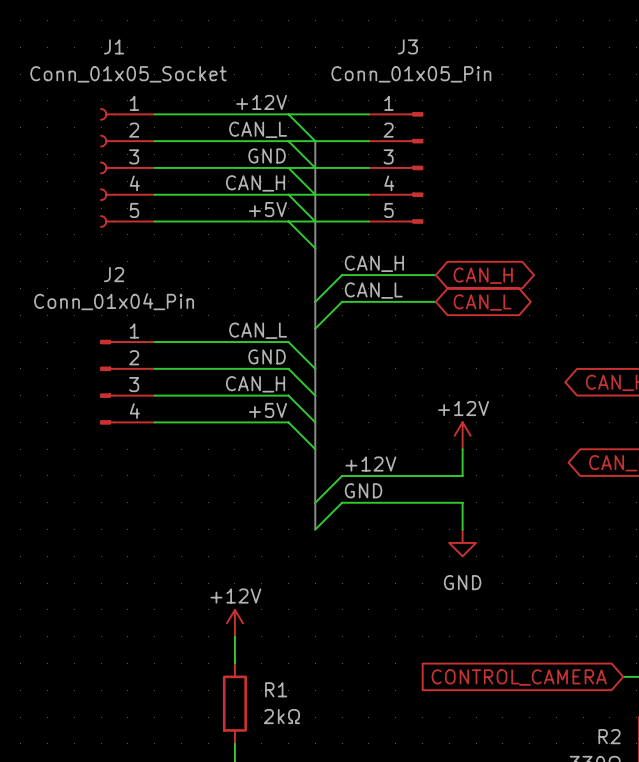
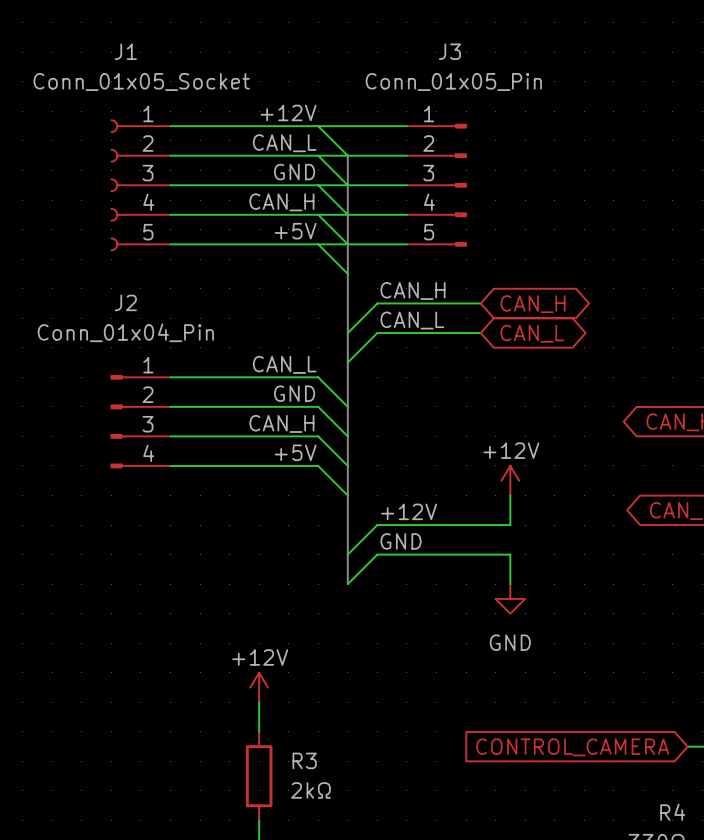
R1 name: R1 (276, 689) -> R3 (304, 760)
R2 name: R2 (609, 736) -> R4 (672, 812)

